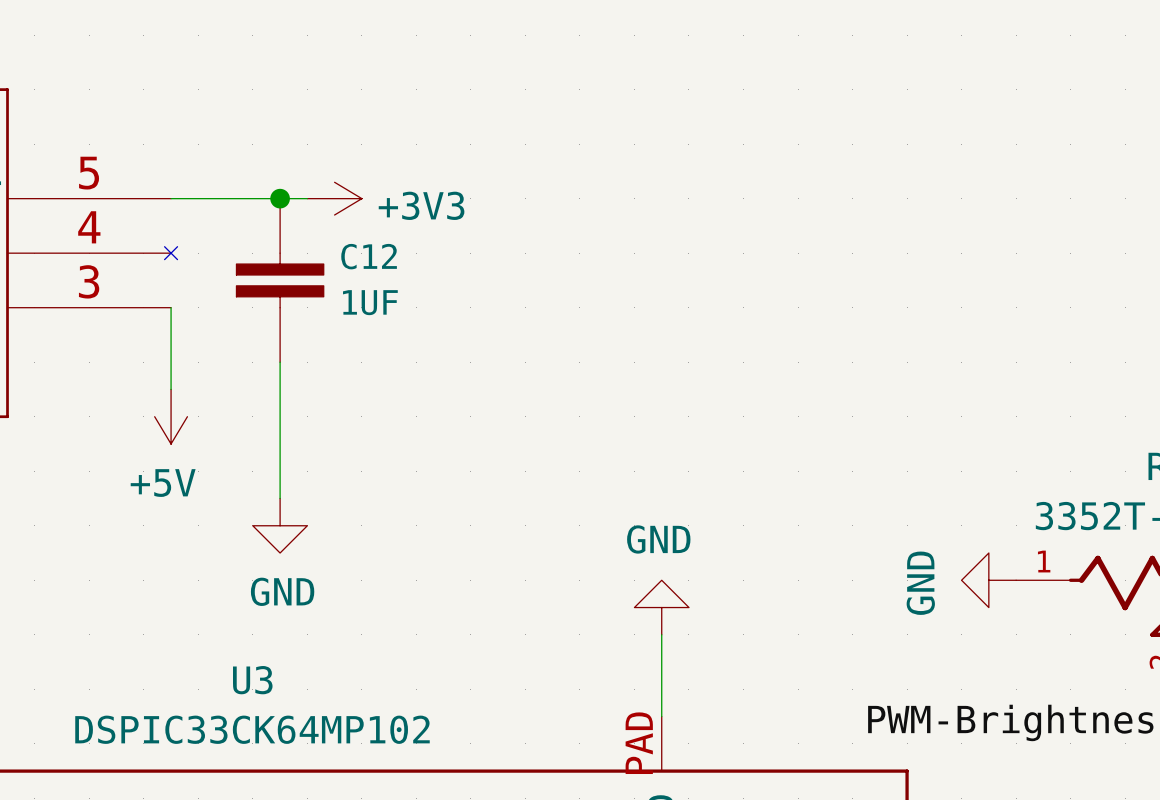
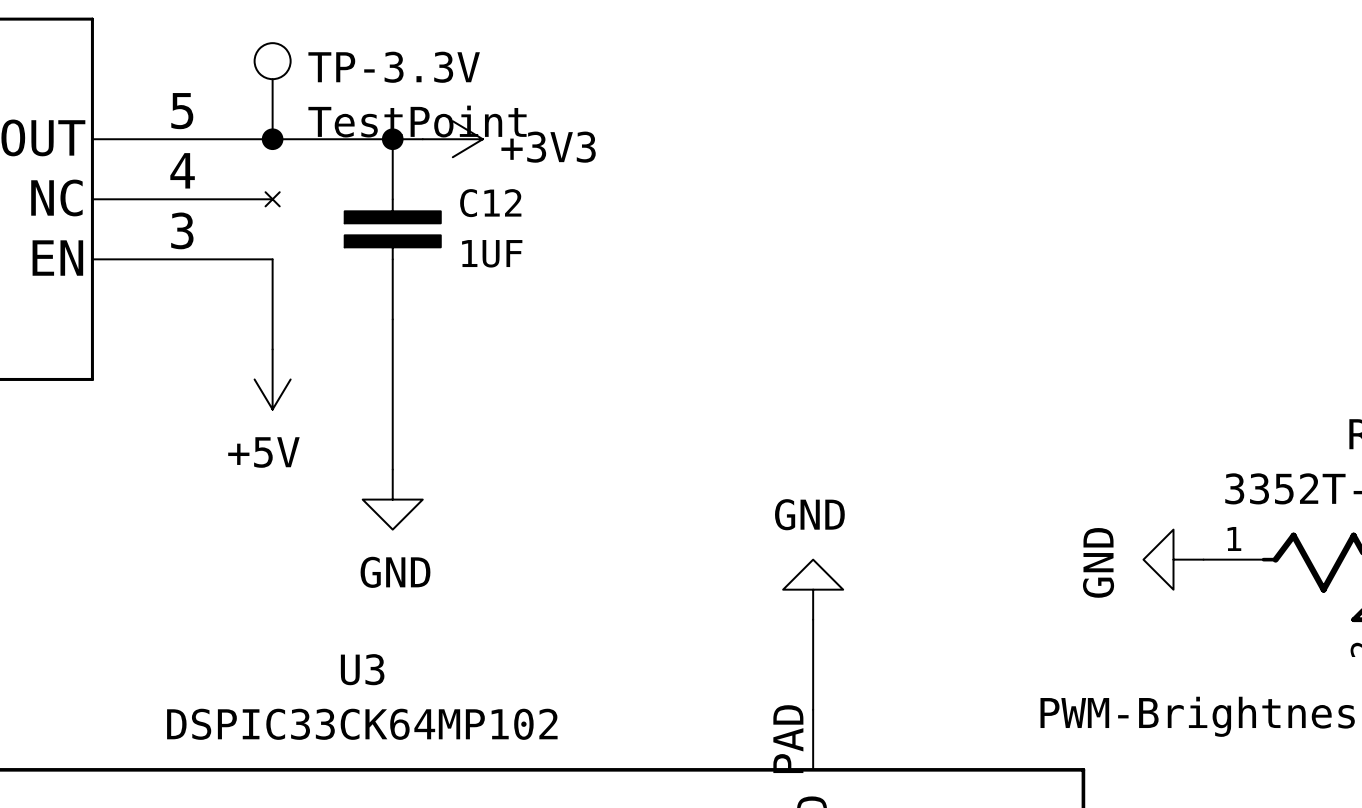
TP-3.3V: none -> TestPoint (272, 91)
junction: none -> (272, 139)

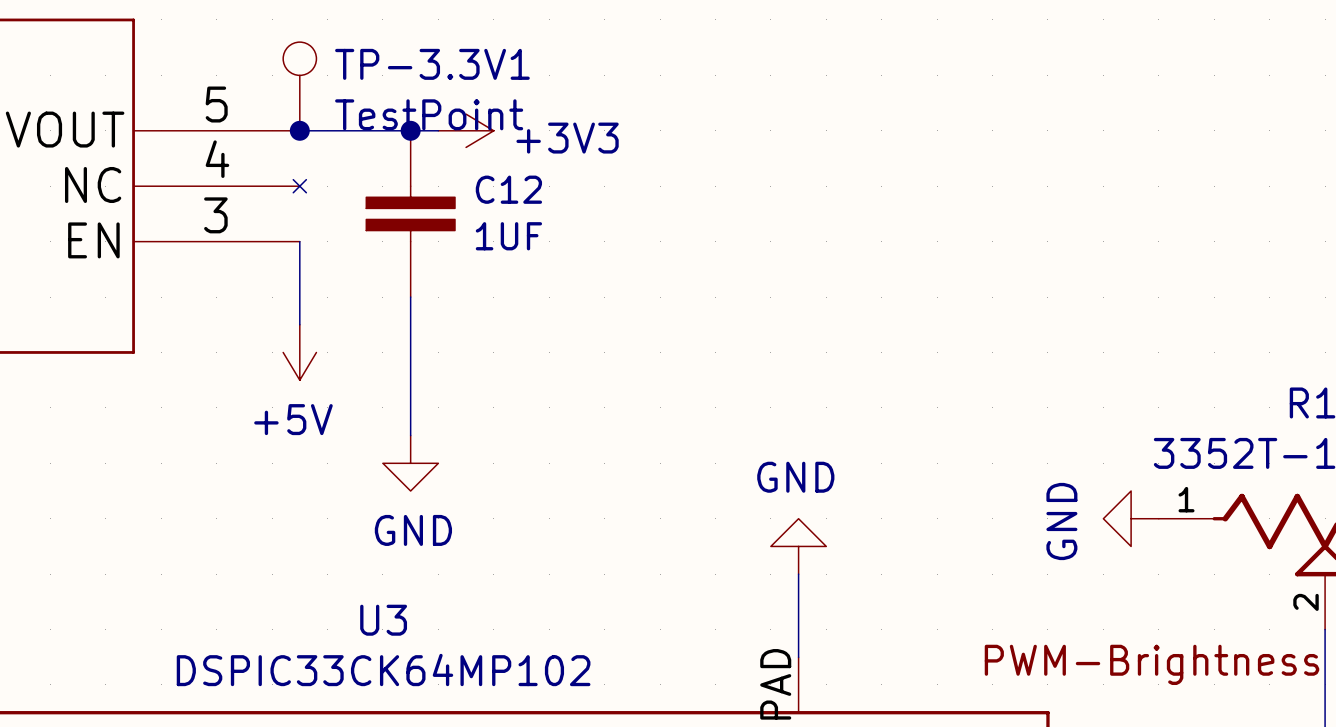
TP-3.3V name: TP-3.3V (394, 67) -> TP-3.3V1 (432, 64)

